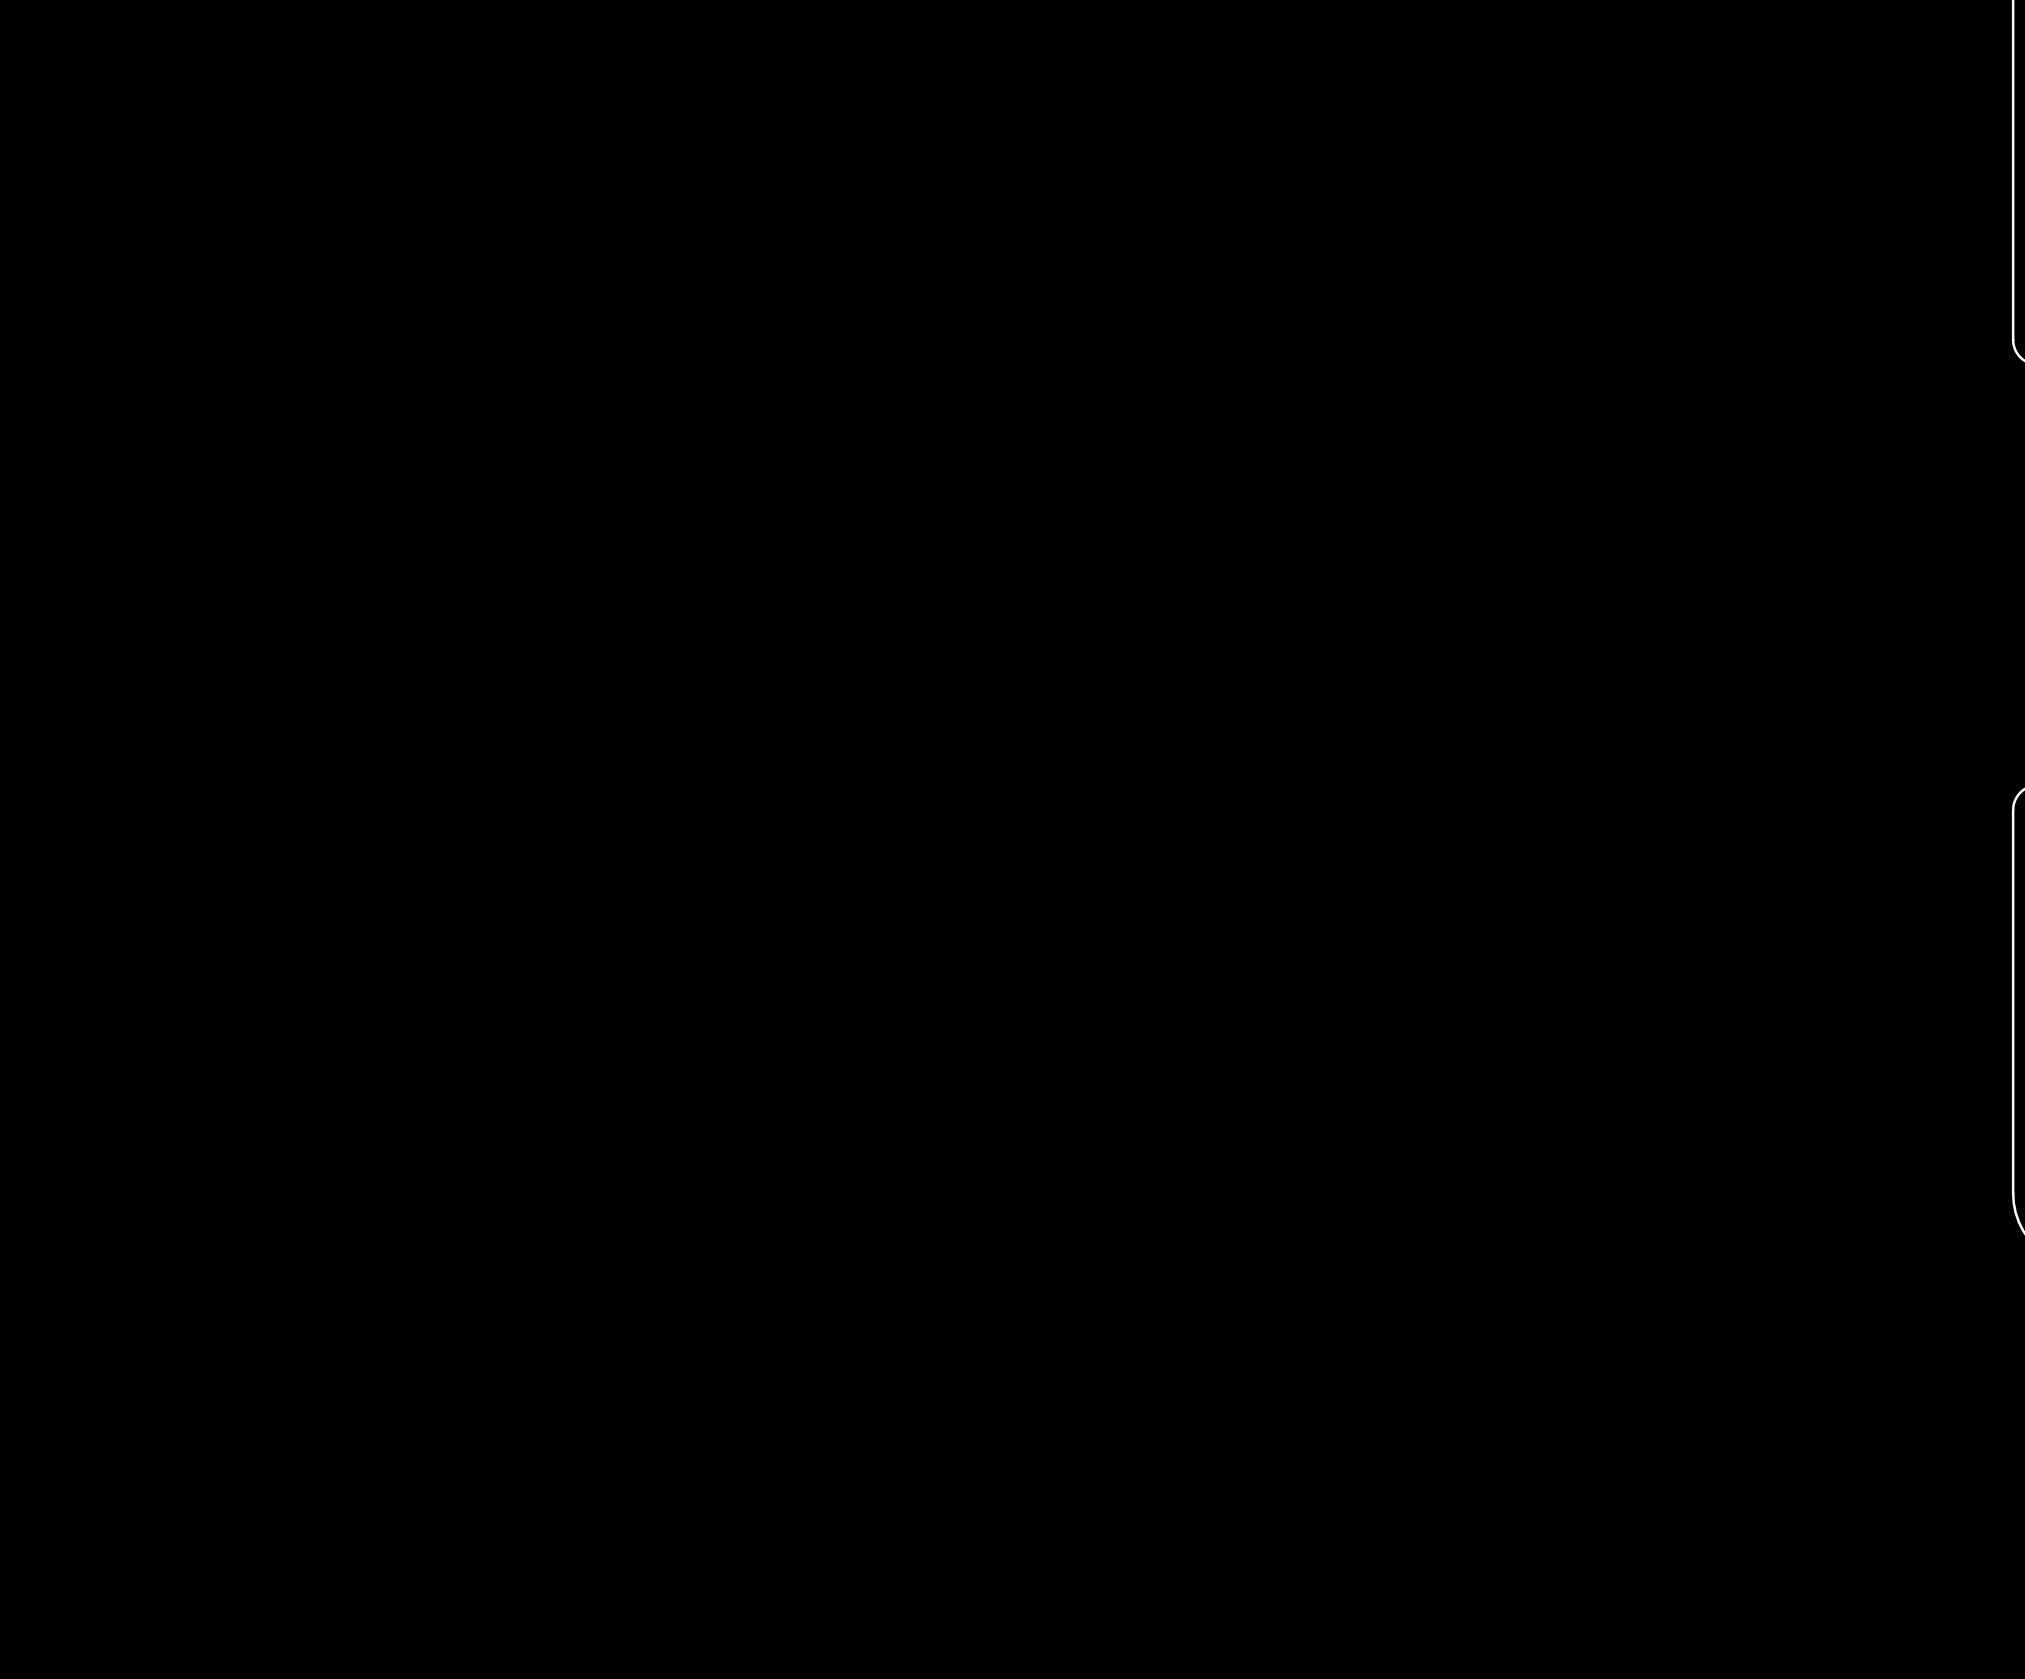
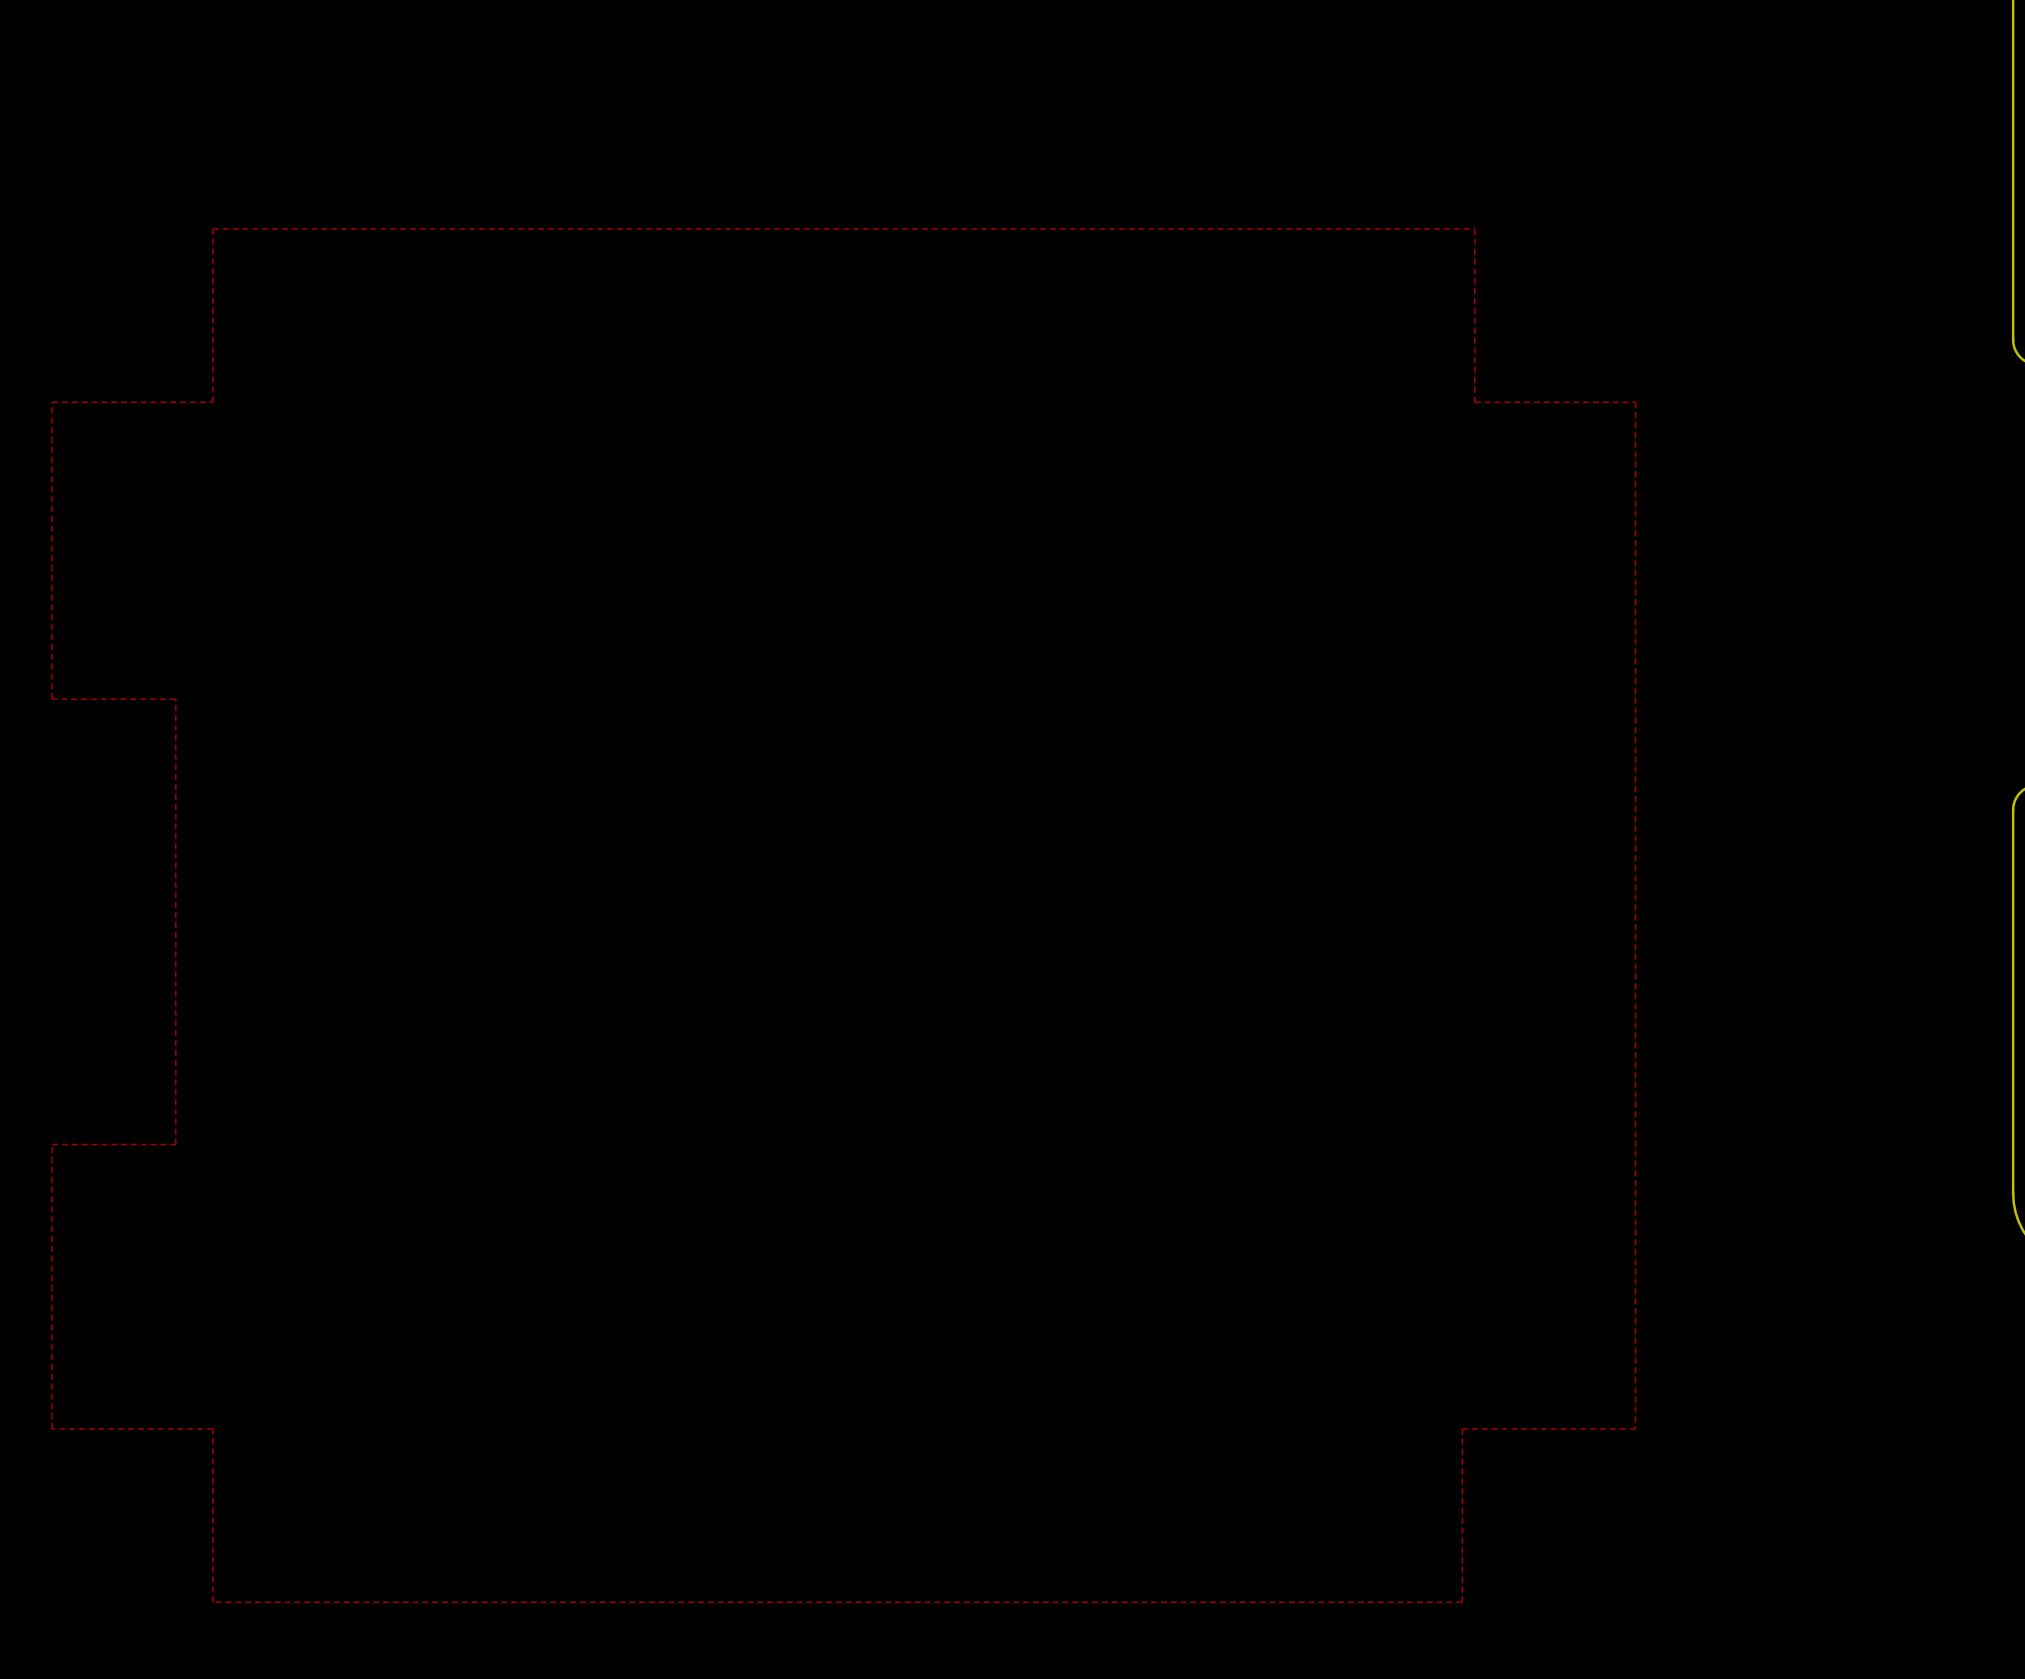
zone outline: none -> (212, 229) (212, 402) (52, 402) (52, 699) (175, 699) (175, 1144) (52, 1144) (52, 1429) (212, 1429) (212, 1602) (1462, 1602) (1462, 1429) (1635, 1429) (1635, 402) (1474, 402) (1474, 229) (212, 229)

